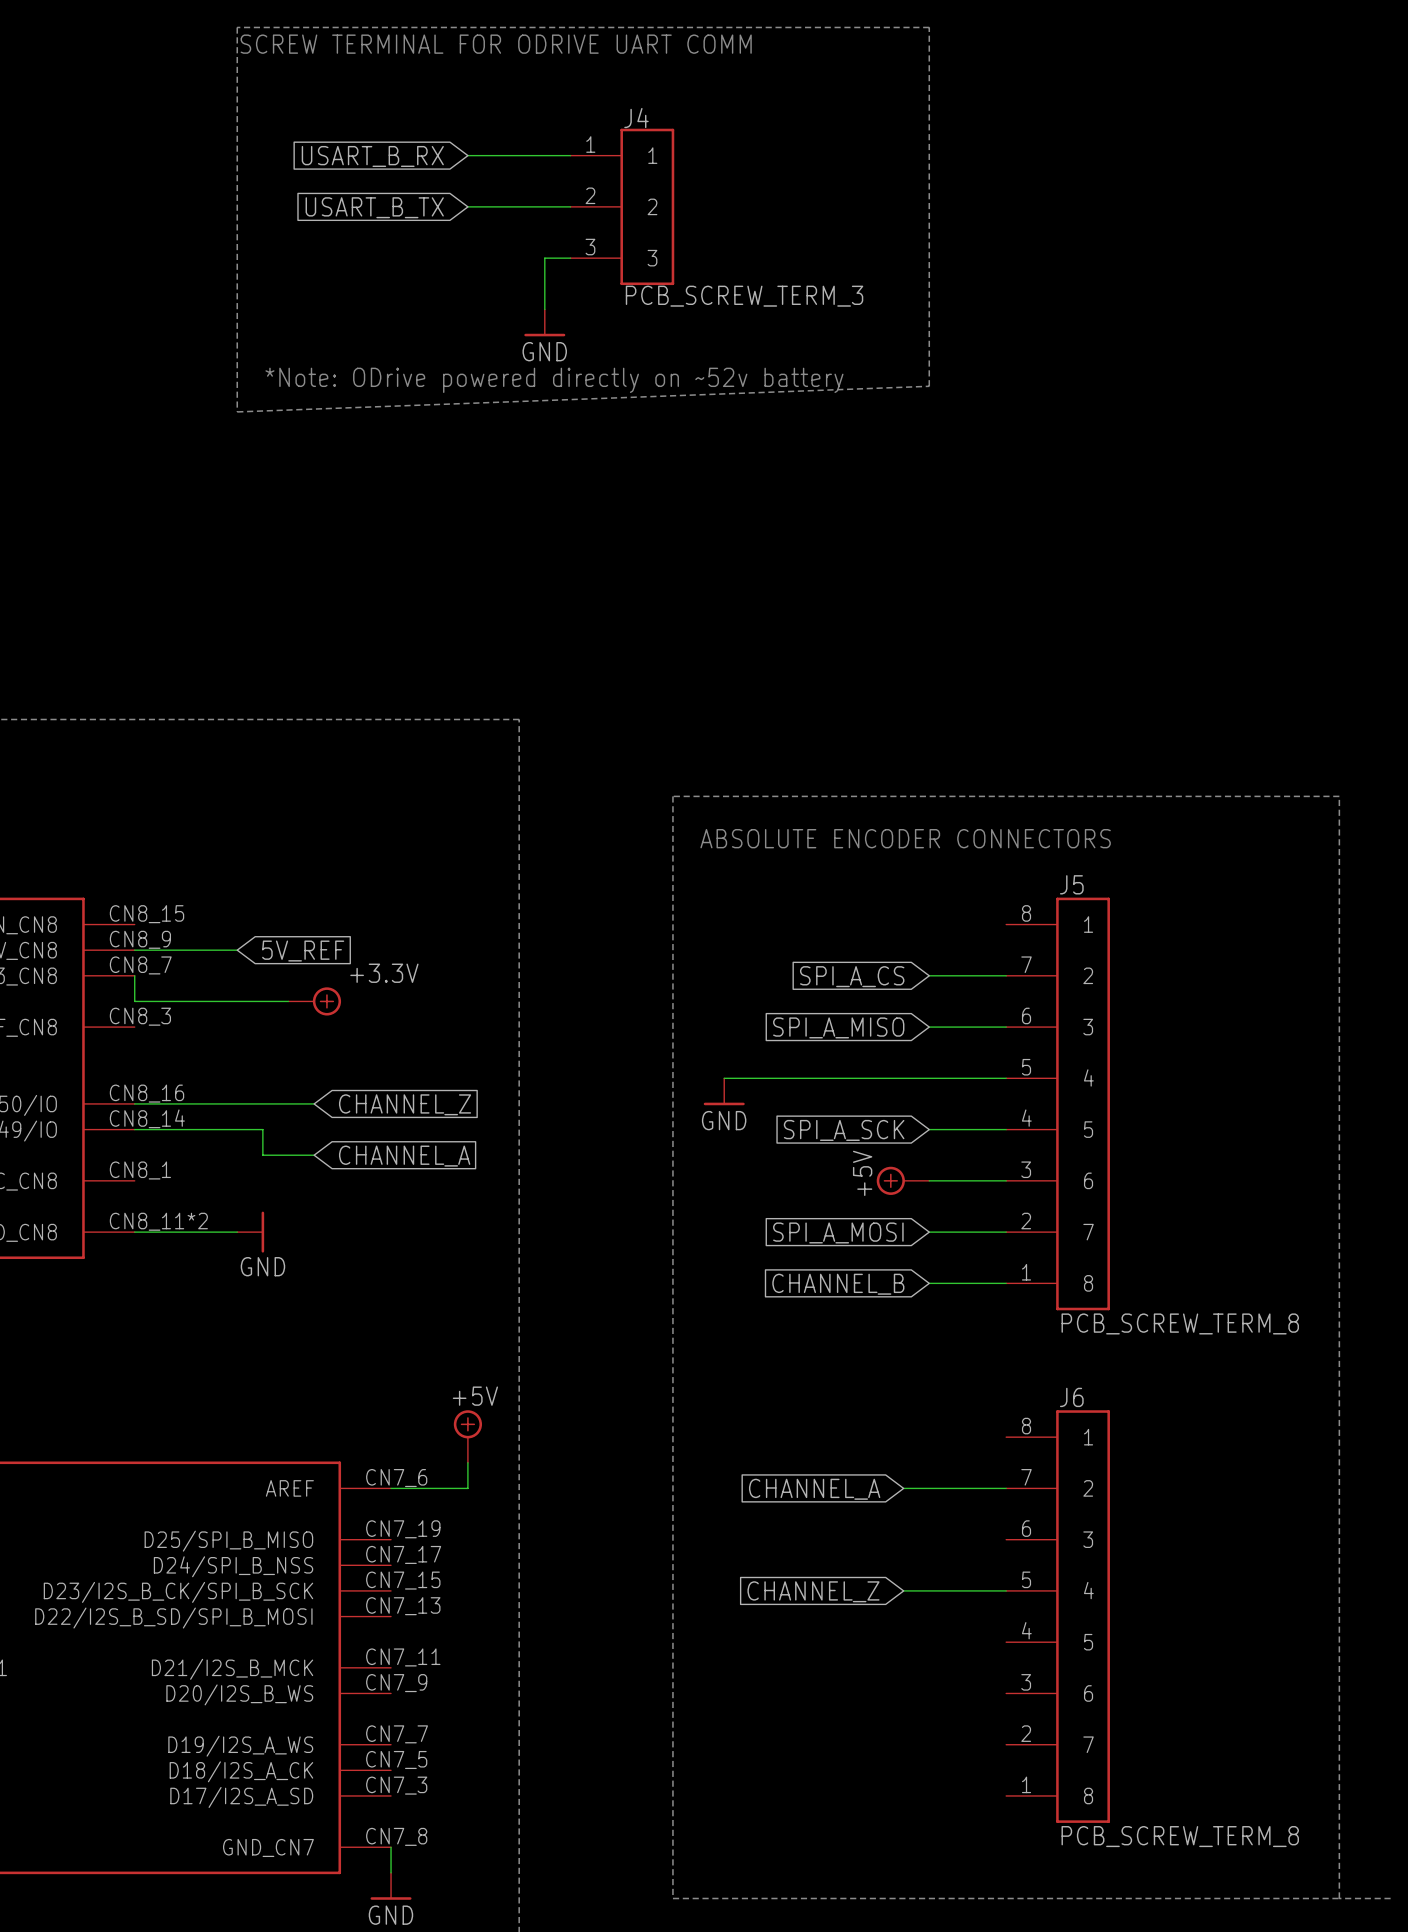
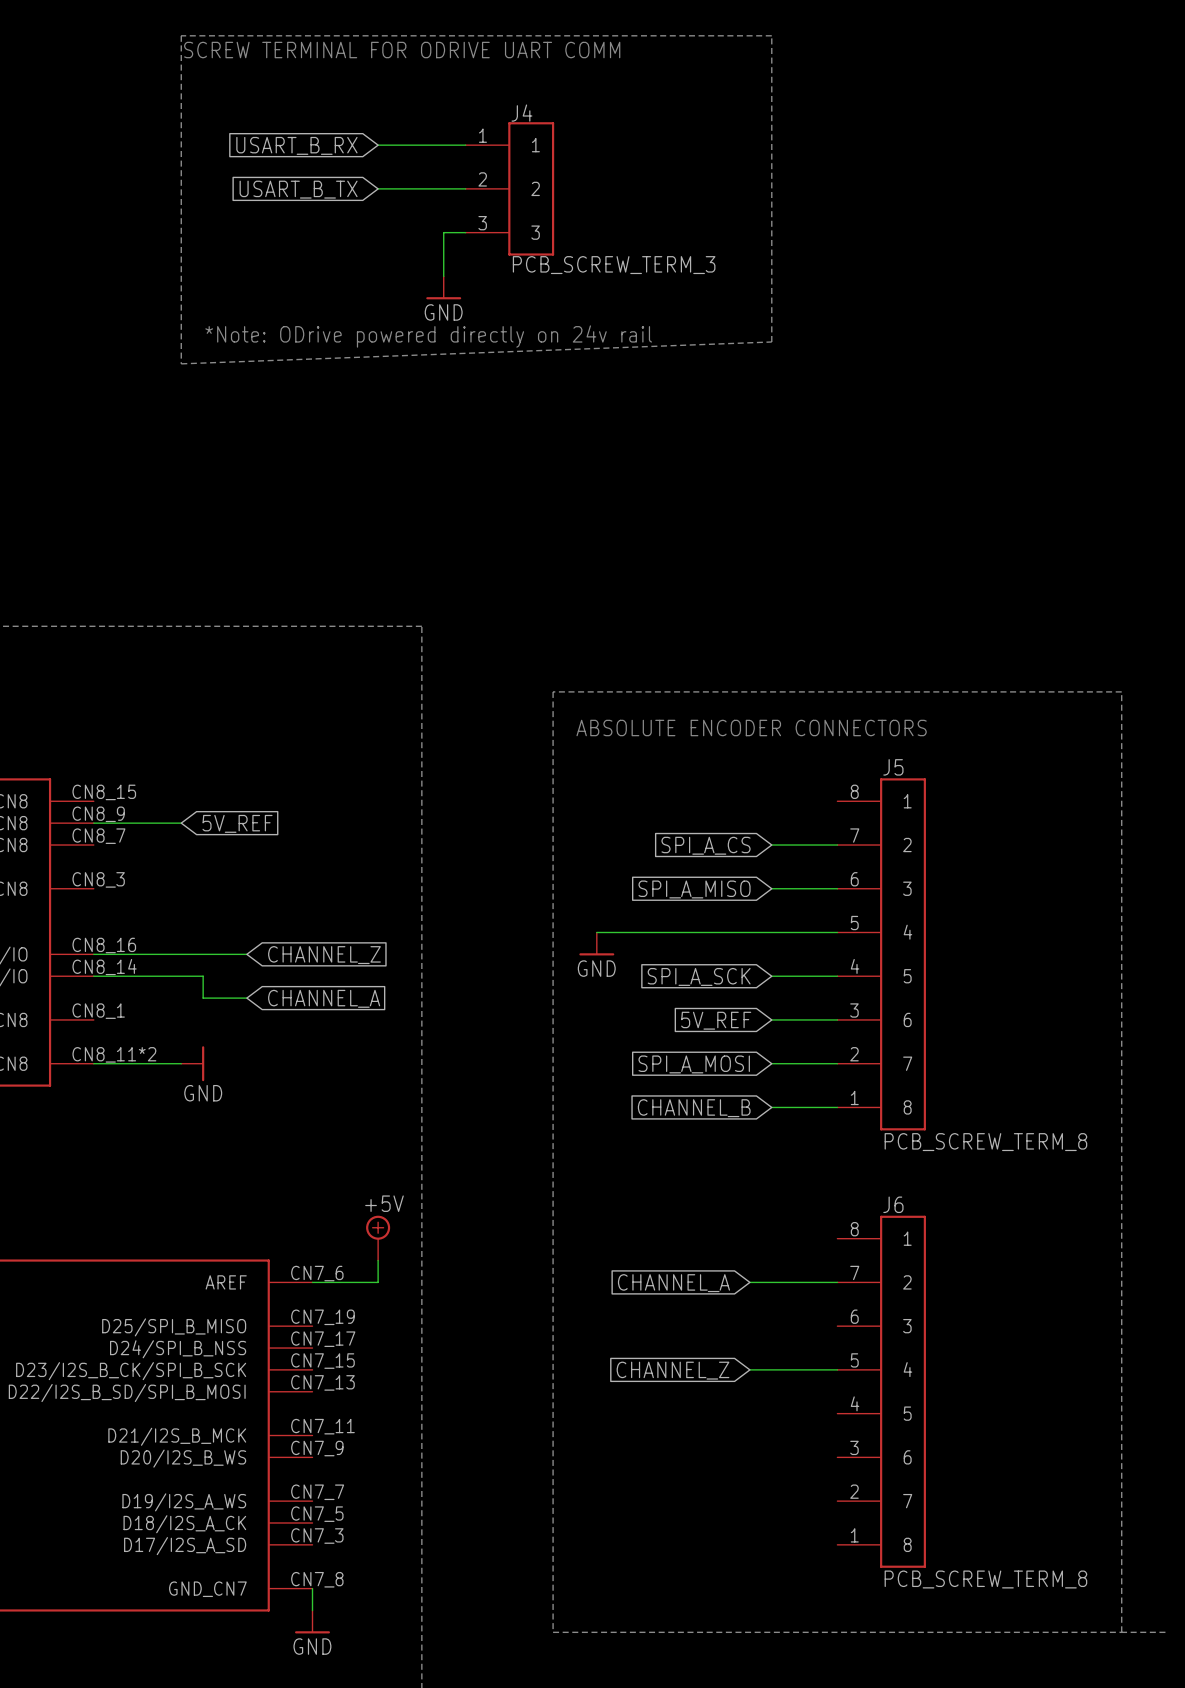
text: *Note: ODrive powered directly on ~52v battery (554, 380) -> *Note: ODrive powered directly on 24v rail (428, 336)
wire: (134, 975) (134, 1001) (288, 1001) -> none
power symbol: +3.3V (314, 1001) -> none
power symbol: +5V (902, 1180) -> none
global label: none -> 5V_REF (716, 1020)

